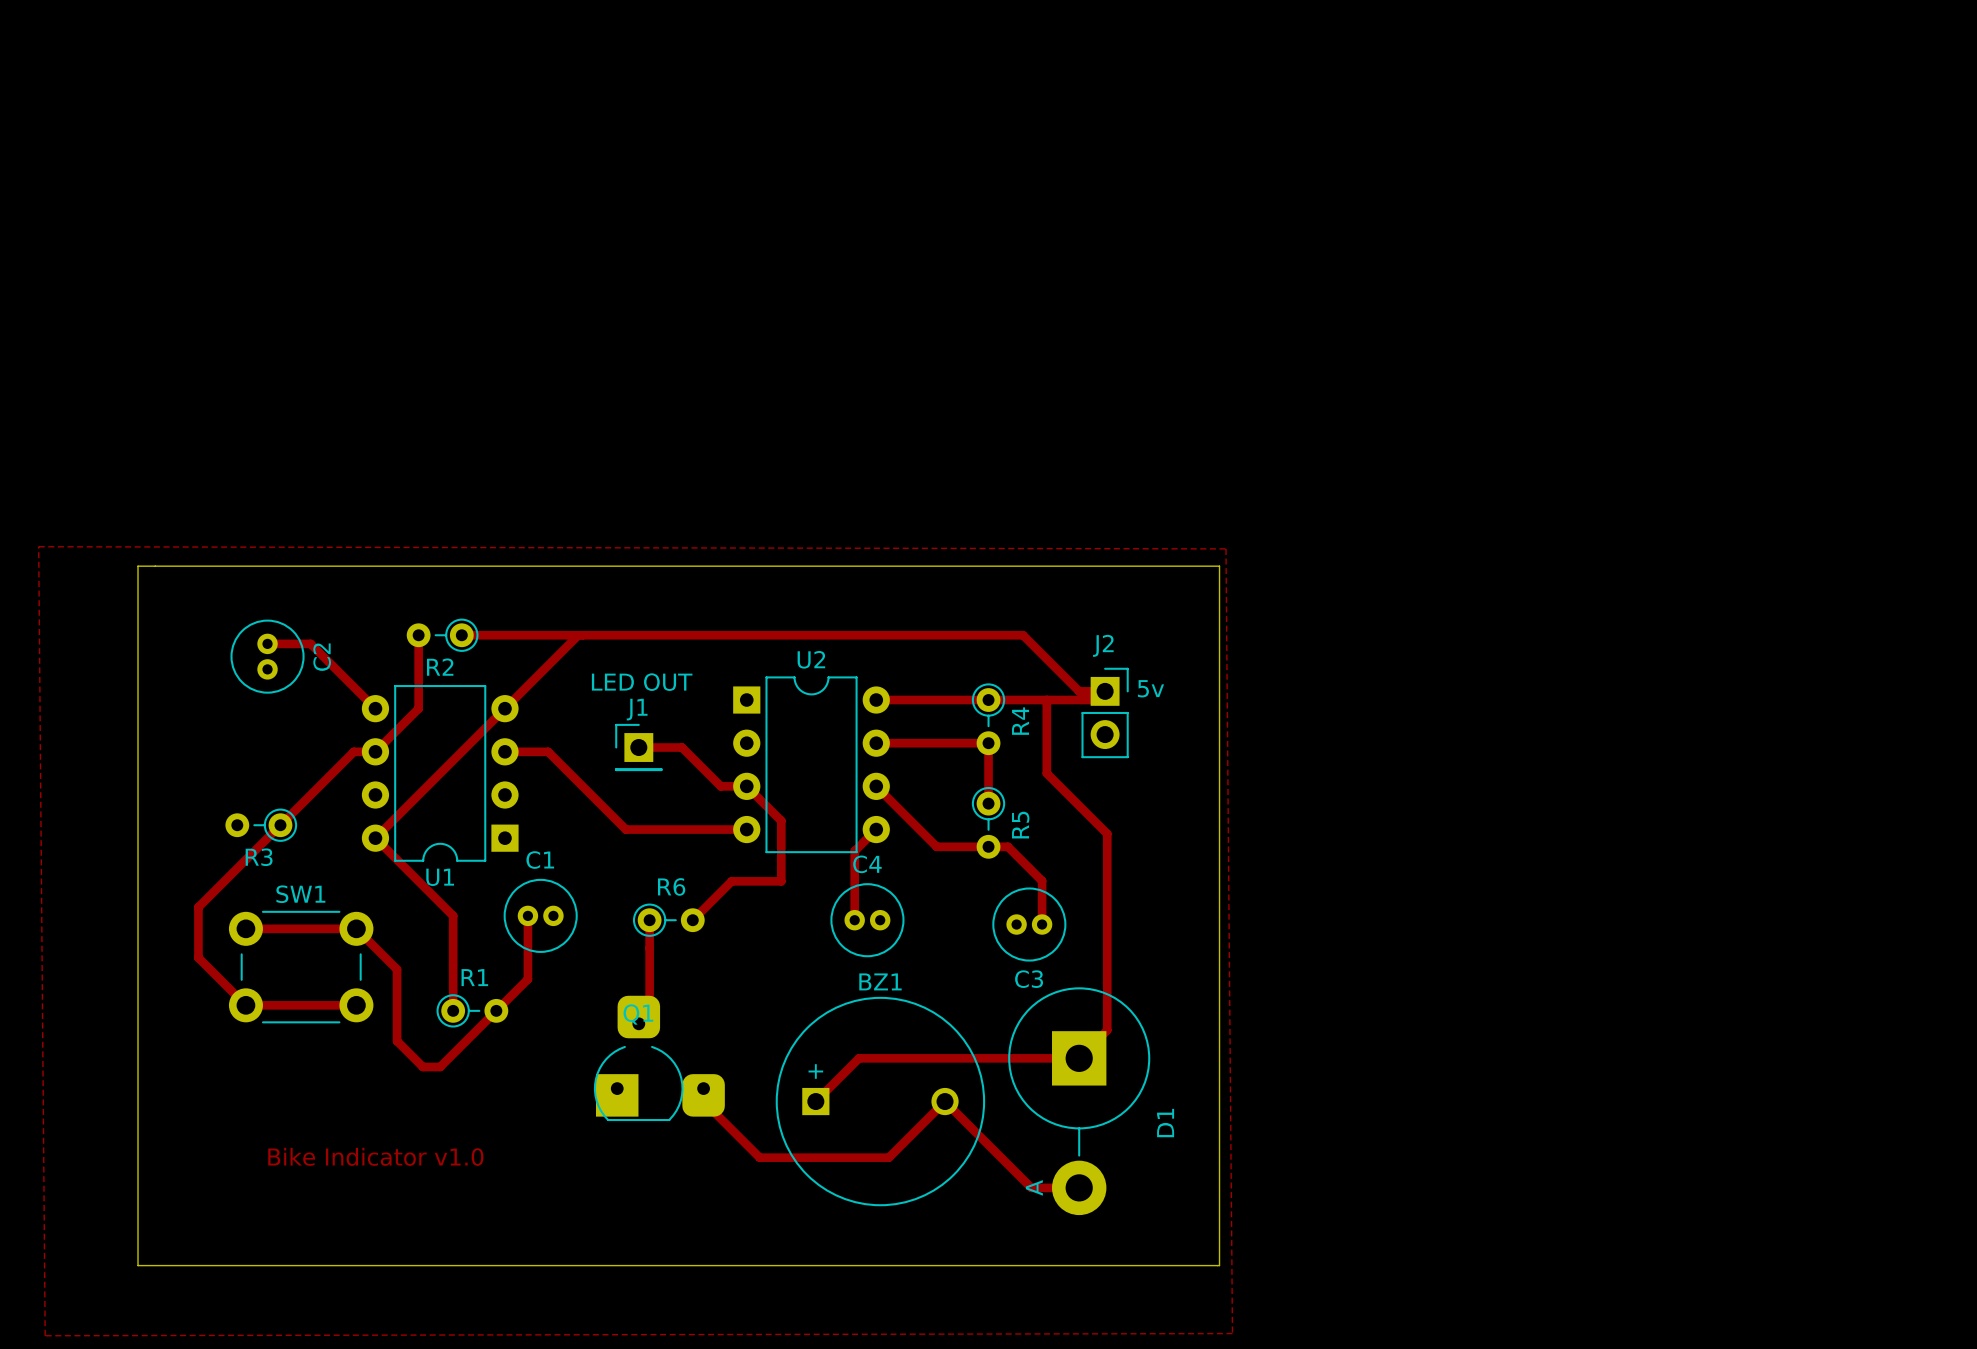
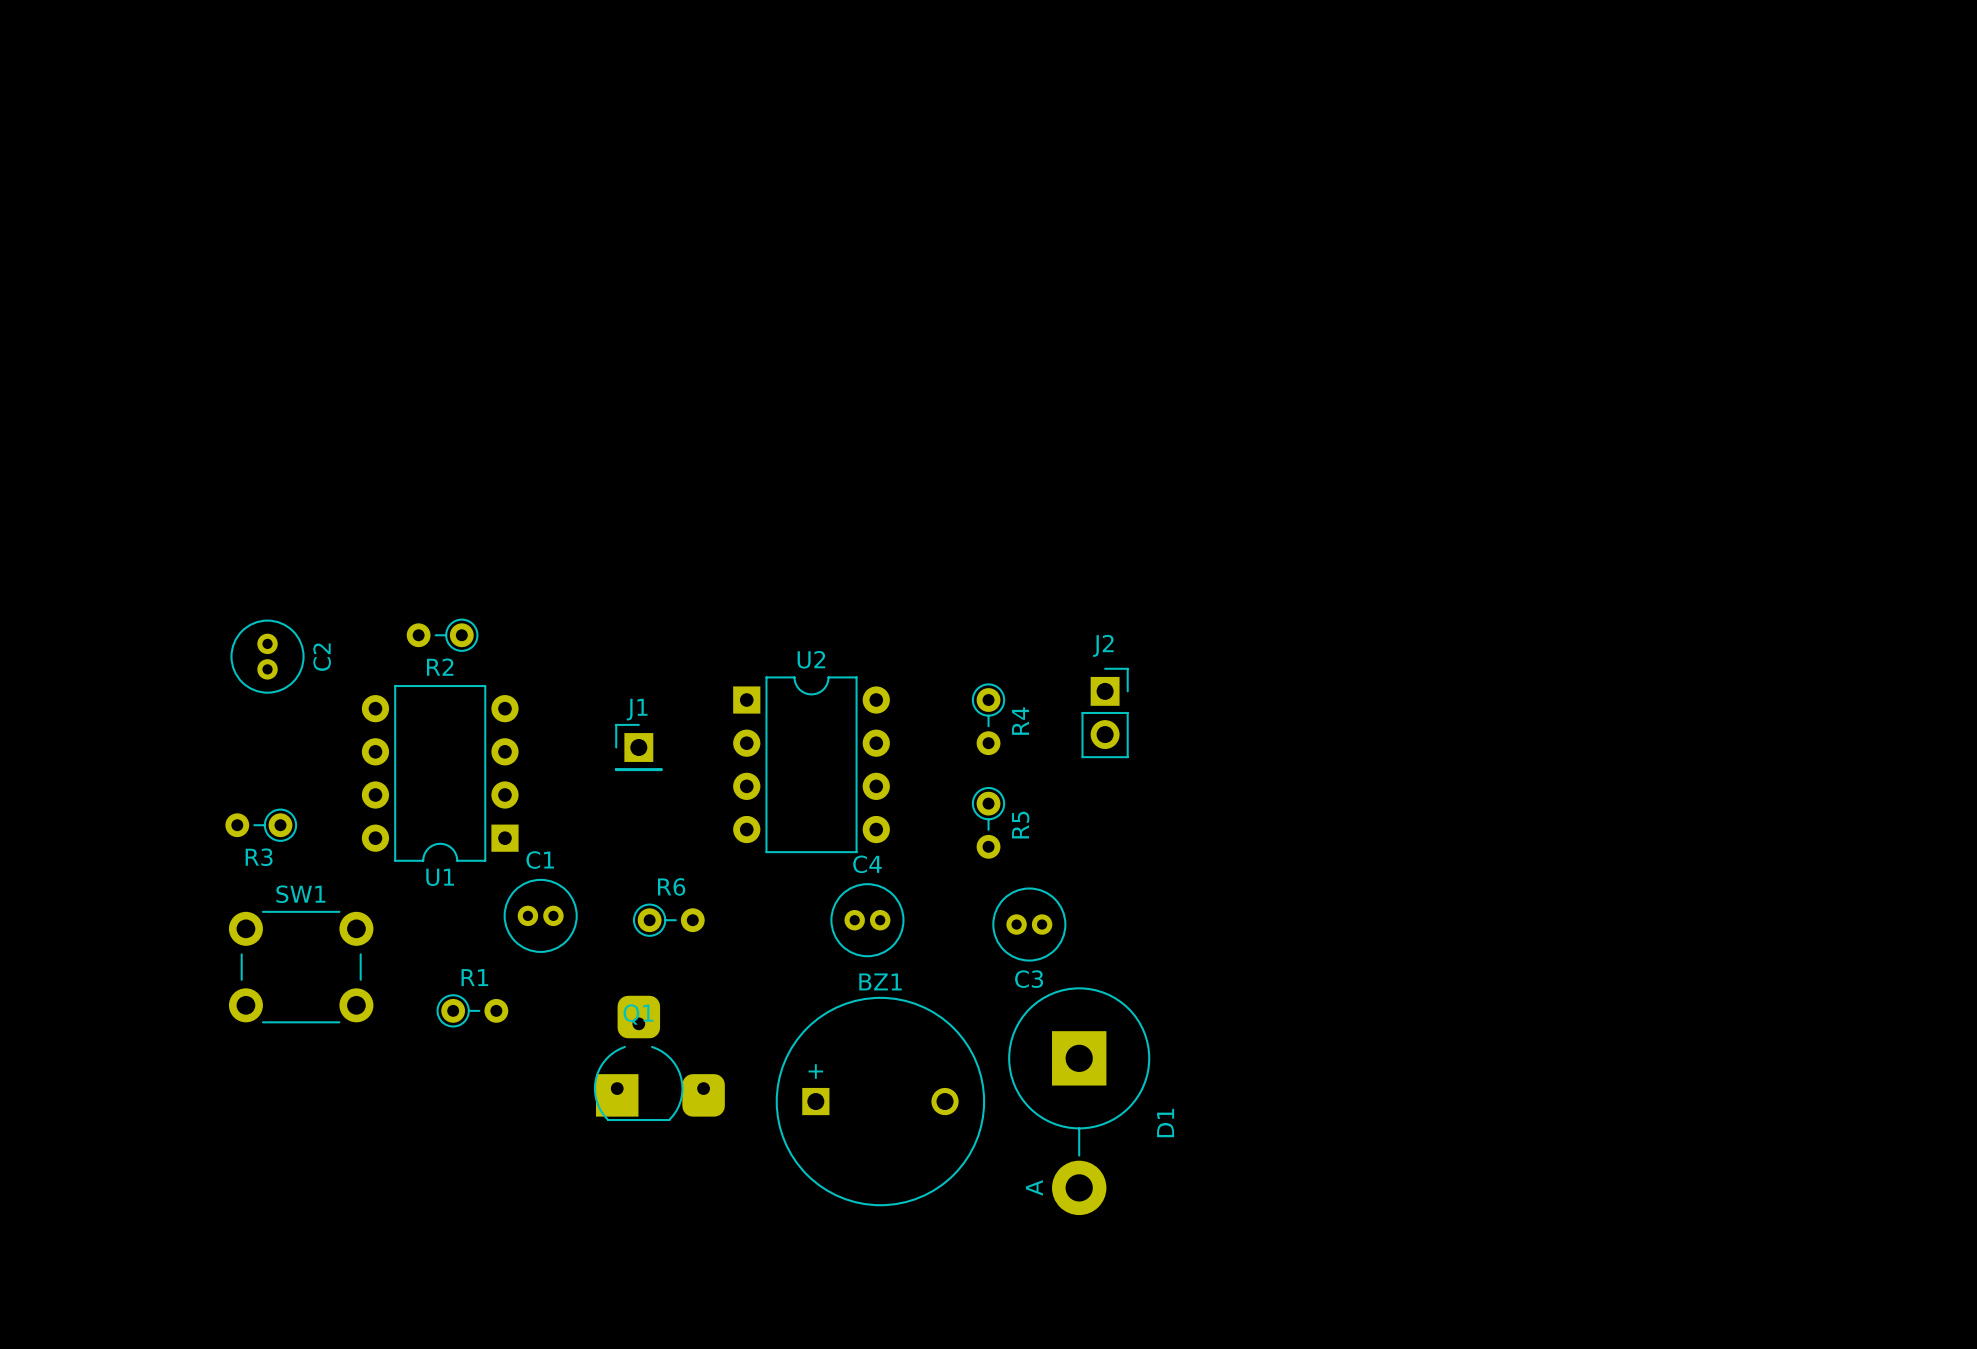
zone outline: (38, 546) (45, 1335) (1232, 1333) (1225, 548) (38, 546) -> none
board edge: (138, 566) (138, 1265) (1219, 1265) (1219, 566) (138, 566) -> none
track: (418, 635) (418, 708) (375, 751) (353, 751) (198, 907) (198, 957) (245, 1005) (356, 1005) -> none
track: (461, 635) (1023, 635) (1079, 691) (1105, 691) (1096, 700) (876, 700) -> none
track: (582, 635) (578, 635) (375, 838) (453, 915) (453, 1010) -> none
track: (267, 643) (310, 643) (375, 708) -> none
text: LED OUT (642, 682) -> none
text: 5v (1150, 688) -> none
track: (1046, 700) (1046, 773) (1107, 833) (1107, 1030) (1079, 1058) -> none
track: (876, 743) (988, 743) (988, 803) -> none
track: (638, 747) (682, 747) (720, 786) (746, 786) (781, 820) (781, 881) (731, 881) (692, 920) -> none
track: (504, 751) (548, 751) (625, 829) (746, 829) -> none
track: (876, 786) (936, 846) (1007, 846) (1042, 880) (1042, 924) -> none
track: (876, 829) (854, 851) (854, 920) -> none
track: (527, 915) (527, 979) (440, 1066) (422, 1066) (397, 1041) (397, 969) (356, 928) (245, 928) -> none
track: (649, 920) (649, 1013) (638, 1023) -> none
track: (1089, 1058) (859, 1058) (815, 1101) -> none
track: (703, 1088) (703, 1101) (759, 1157) (888, 1157) (945, 1101) (1031, 1187) (1079, 1187) -> none
text: Bike Indicator v1.0 (375, 1156) -> none

